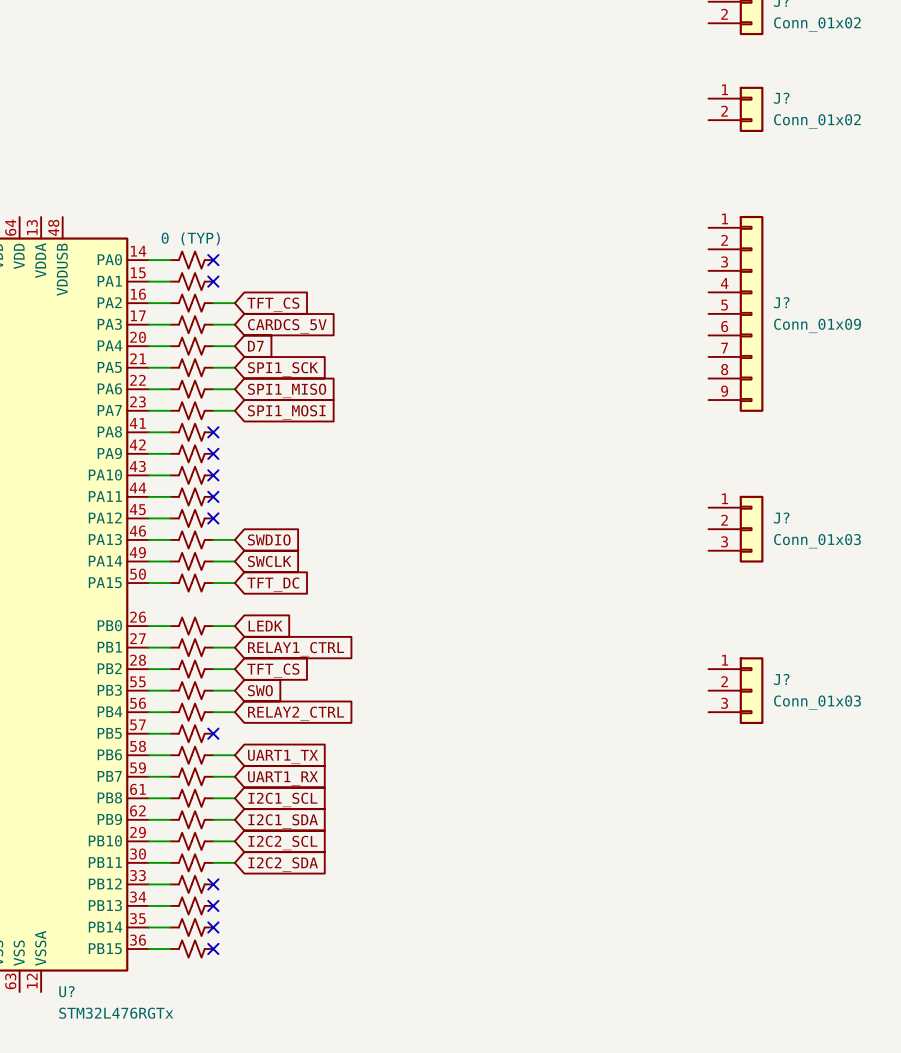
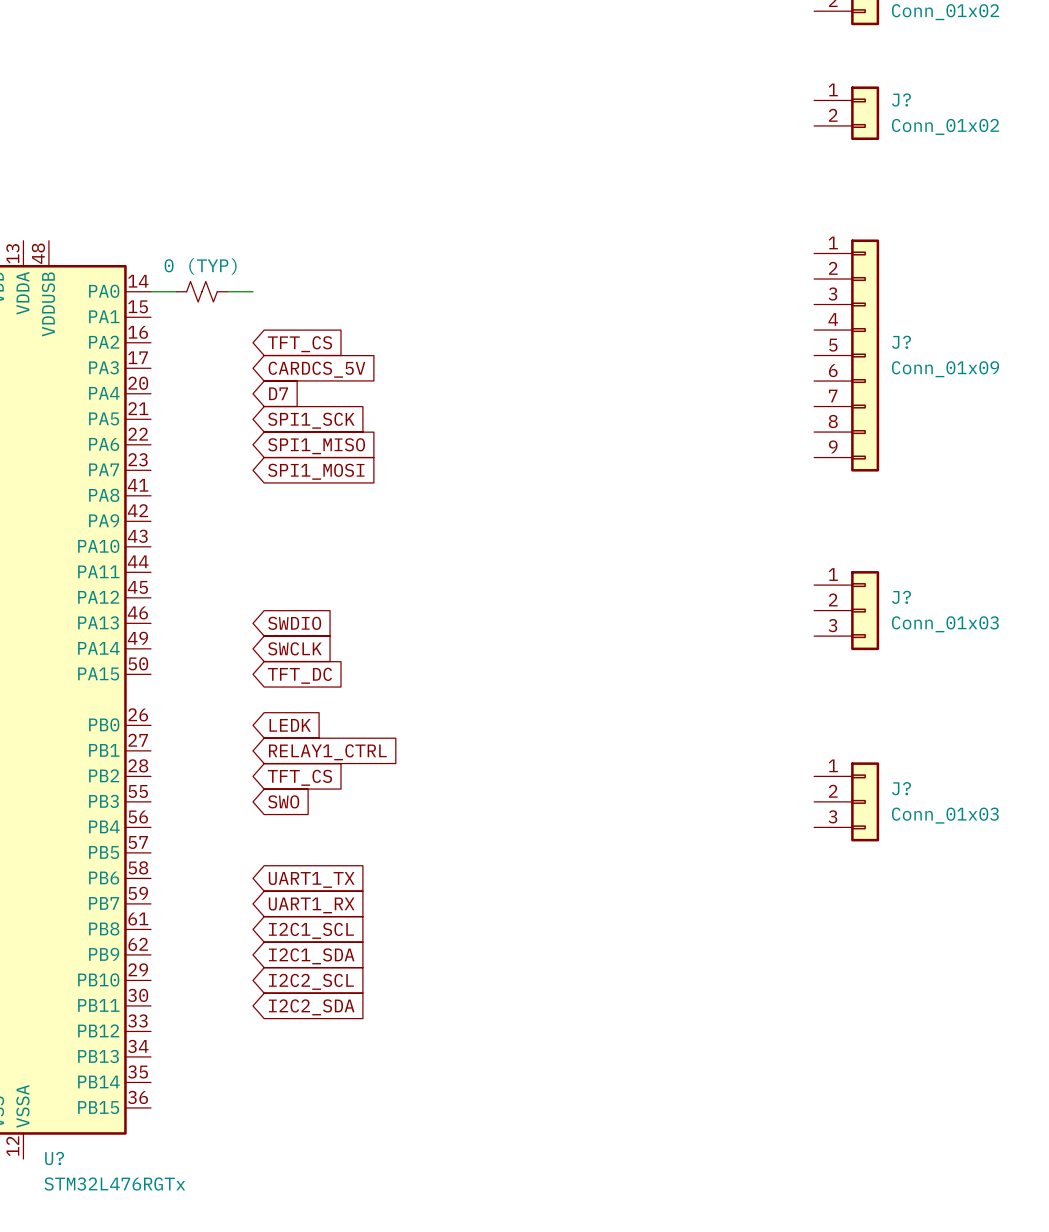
no-connect mark: (213, 260) -> none
wire: (148, 281) (170, 281) -> none
part: (191, 281) -> none
no-connect mark: (213, 281) -> none
wire: (148, 303) (170, 303) -> none
part: (191, 303) -> none
wire: (213, 303) (234, 303) -> (227, 291) (252, 291)
wire: (148, 324) (170, 324) -> none
part: (191, 324) -> none
wire: (213, 324) (234, 324) -> none
wire: (148, 346) (170, 346) -> none
part: (191, 346) -> none
wire: (213, 346) (234, 346) -> none
wire: (148, 367) (170, 367) -> none
part: (191, 367) -> none
wire: (213, 367) (234, 367) -> none
wire: (148, 389) (170, 389) -> none
part: (191, 389) -> none
wire: (213, 389) (234, 389) -> none
wire: (148, 410) (170, 410) -> none
part: (191, 410) -> none
wire: (213, 410) (234, 410) -> none
wire: (148, 432) (170, 432) -> none
part: (191, 432) -> none
no-connect mark: (213, 432) -> none
wire: (148, 453) (170, 453) -> none
part: (191, 453) -> none
no-connect mark: (213, 453) -> none
wire: (148, 475) (170, 475) -> none
part: (191, 475) -> none
no-connect mark: (213, 475) -> none
wire: (148, 496) (170, 496) -> none
part: (191, 496) -> none
no-connect mark: (213, 496) -> none
wire: (148, 518) (170, 518) -> none
part: (191, 518) -> none
no-connect mark: (213, 518) -> none
wire: (148, 539) (170, 539) -> none
part: (191, 539) -> none
wire: (213, 539) (234, 539) -> none
wire: (148, 561) (170, 561) -> none
part: (191, 561) -> none
wire: (213, 561) (234, 561) -> none
wire: (148, 583) (170, 583) -> none
part: (191, 583) -> none
wire: (213, 583) (234, 583) -> none
wire: (148, 626) (170, 626) -> none
part: (191, 626) -> none
wire: (213, 626) (234, 626) -> none
wire: (148, 647) (170, 647) -> none
part: (191, 647) -> none
wire: (213, 647) (234, 647) -> none
wire: (148, 669) (170, 669) -> none
part: (191, 669) -> none
wire: (213, 669) (234, 669) -> none
wire: (148, 690) (170, 690) -> none
part: (191, 690) -> none
wire: (213, 690) (234, 690) -> none
wire: (148, 712) (170, 712) -> none
part: (191, 712) -> none
wire: (213, 712) (234, 712) -> none
global label: RELAY2_CTRL (296, 713) -> none
wire: (148, 733) (170, 733) -> none
part: (191, 733) -> none
no-connect mark: (213, 733) -> none
wire: (148, 755) (170, 755) -> none
part: (191, 755) -> none
wire: (213, 755) (234, 755) -> none
wire: (148, 776) (170, 776) -> none
part: (191, 776) -> none
wire: (213, 776) (234, 776) -> none
wire: (148, 798) (170, 798) -> none
part: (191, 798) -> none
wire: (213, 798) (234, 798) -> none
wire: (148, 819) (170, 819) -> none
part: (191, 819) -> none
wire: (213, 819) (234, 819) -> none
wire: (148, 841) (170, 841) -> none
part: (191, 841) -> none
wire: (213, 841) (234, 841) -> none
wire: (148, 862) (170, 862) -> none
part: (191, 862) -> none
wire: (213, 862) (234, 862) -> none
wire: (148, 884) (170, 884) -> none
part: (191, 884) -> none
no-connect mark: (213, 884) -> none
wire: (148, 905) (170, 905) -> none
part: (191, 905) -> none
no-connect mark: (213, 905) -> none
wire: (148, 927) (170, 927) -> none
part: (191, 927) -> none
no-connect mark: (213, 927) -> none
wire: (148, 949) (170, 949) -> none
part: (191, 949) -> none
no-connect mark: (213, 949) -> none

